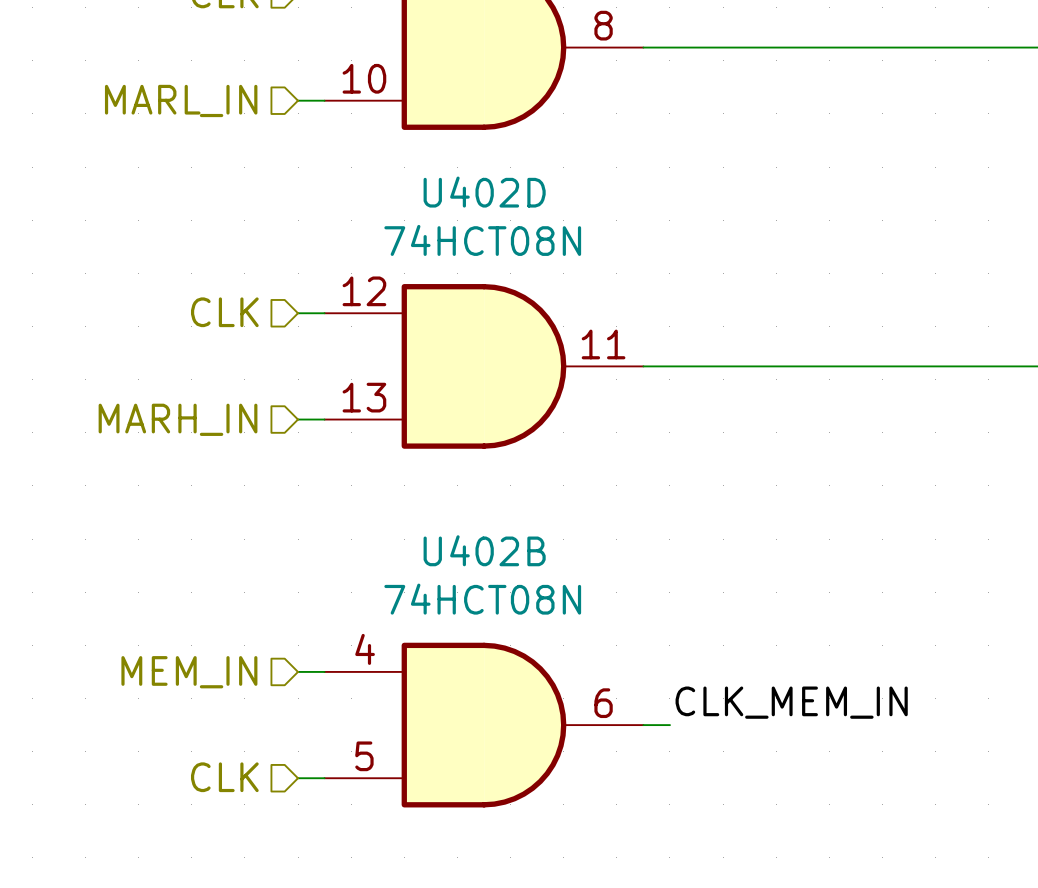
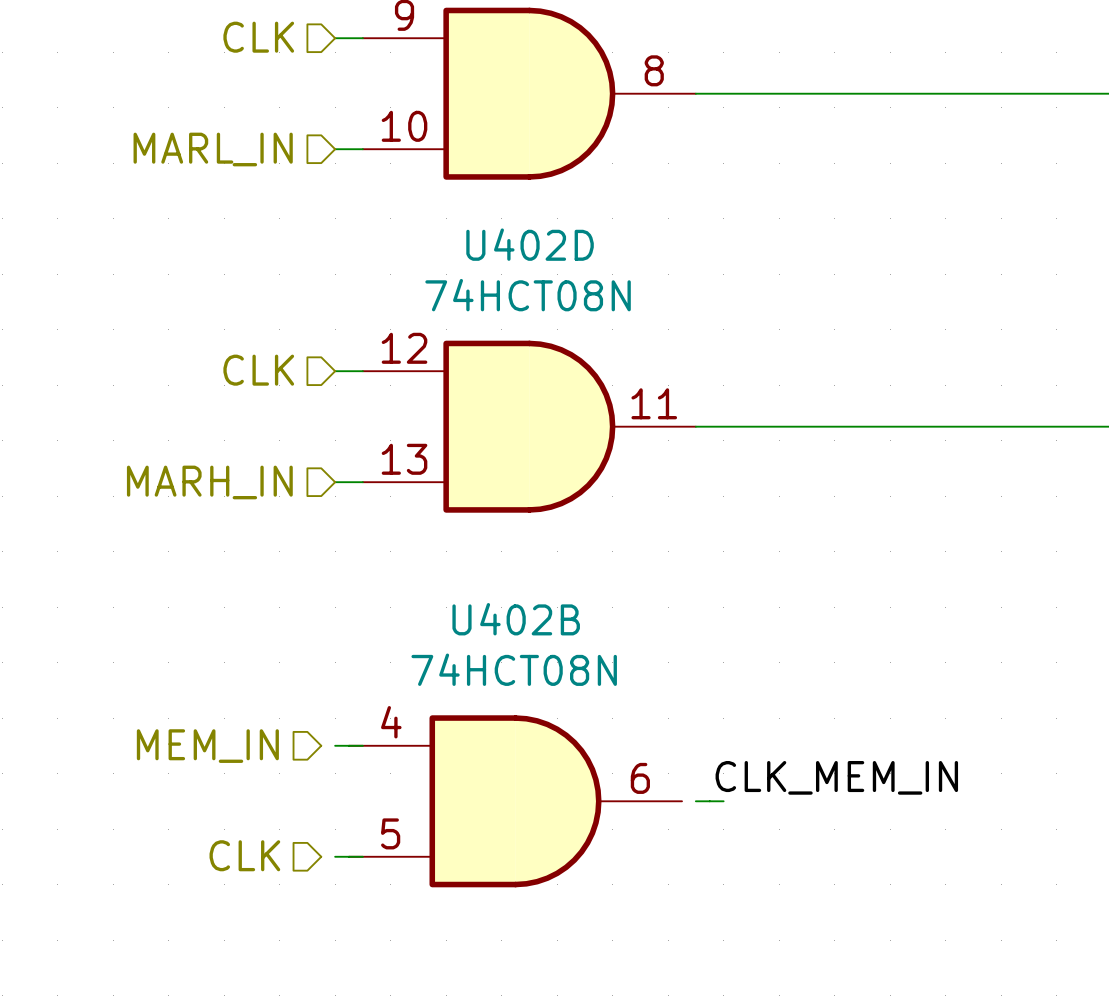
hierarchical label position: MEM_IN (189, 672) -> MEM_IN (207, 746)
label position: CLK_MEM_IN (791, 702) -> CLK_MEM_IN (836, 777)
U402B position: (483, 725) -> (515, 801)
hierarchical label position: CLK (224, 777) -> CLK (244, 855)

